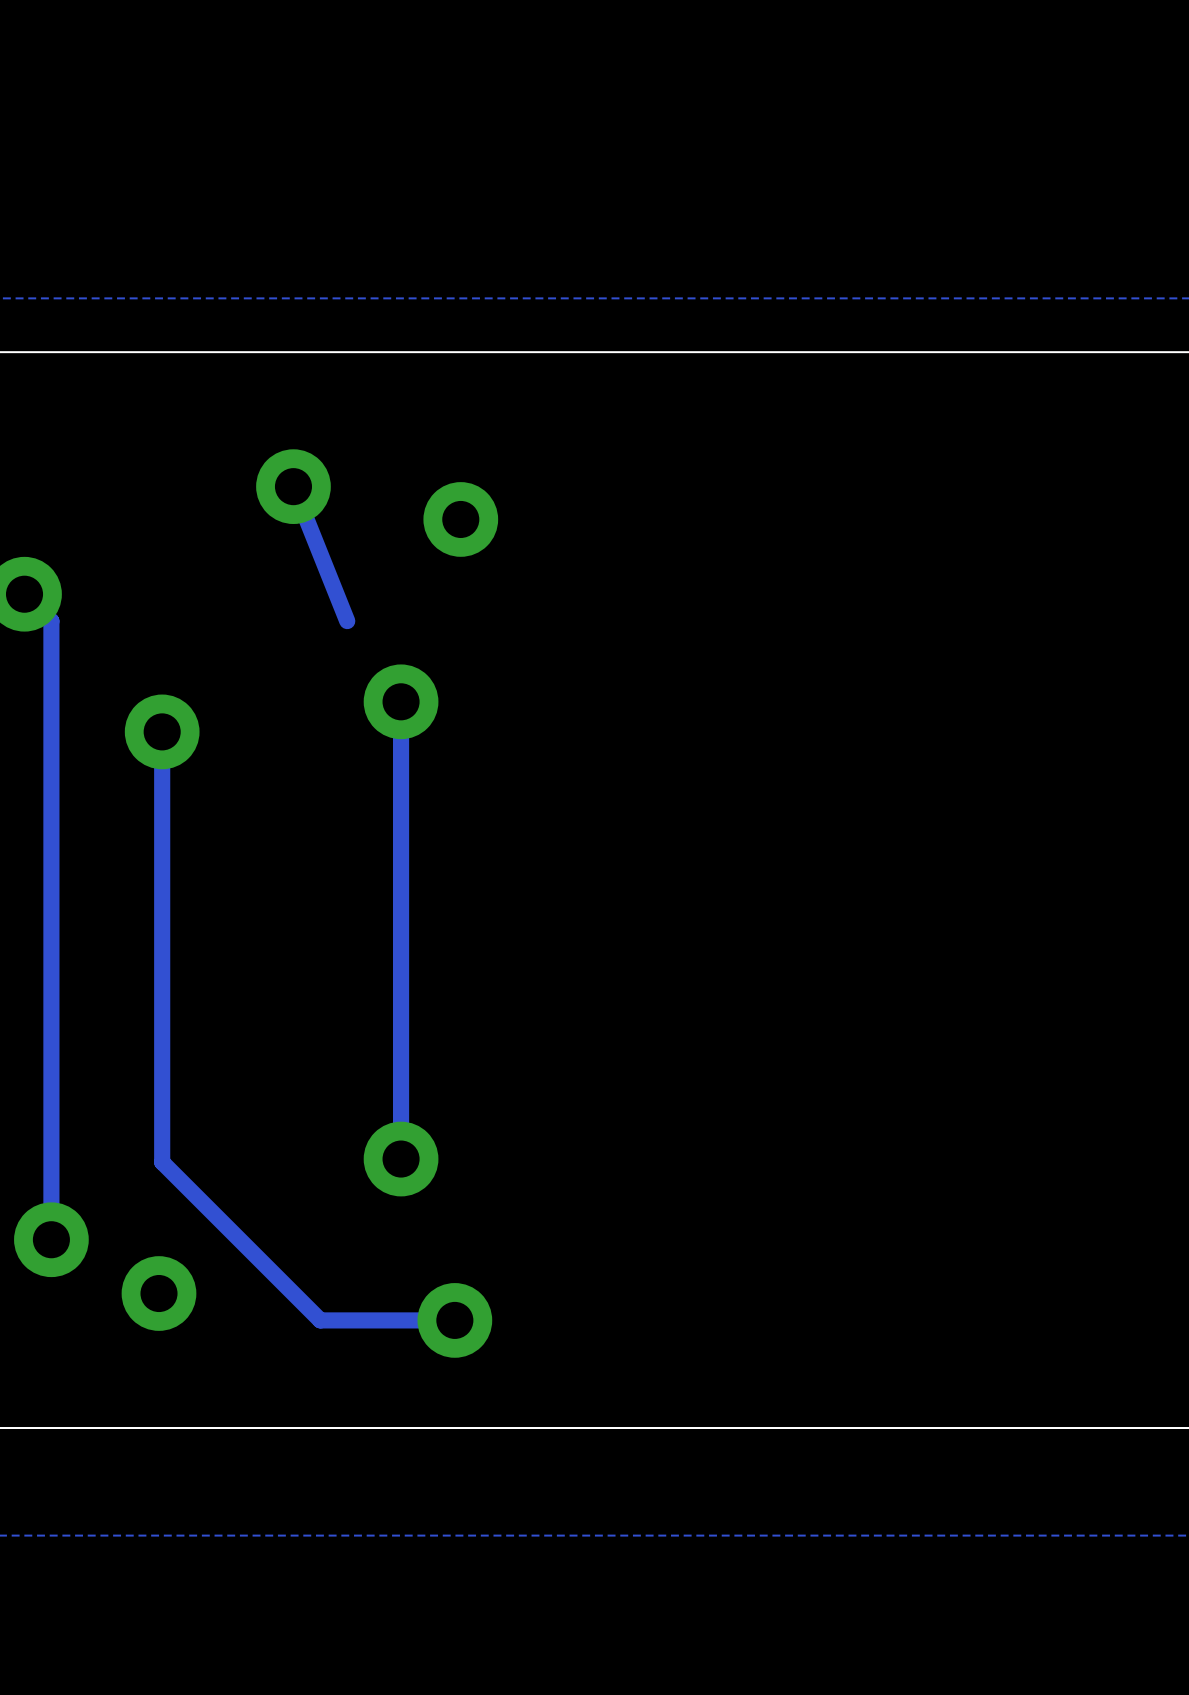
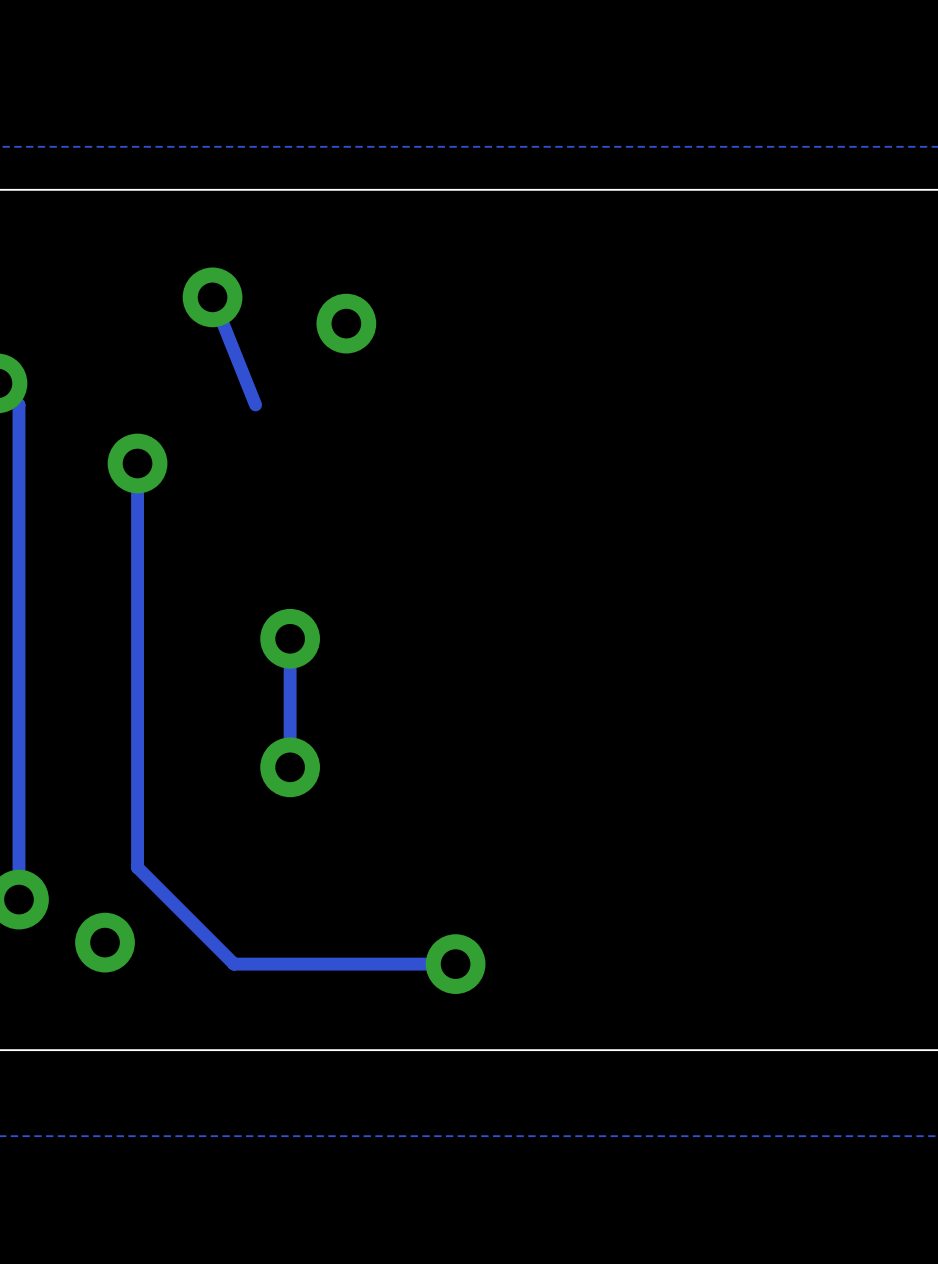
track: (401, 701) (401, 1159) -> none
via: (401, 701) -> none
track: (162, 731) (162, 1162) (199, 1199) -> (137, 463) (137, 867)
via position: (162, 731) -> (137, 463)
track: none -> (290, 638) (290, 767)
via: none -> (290, 638)
via position: (401, 1159) -> (290, 767)
via: (454, 1320) -> none
track: none -> (455, 964) (341, 964)
via: none -> (455, 964)

